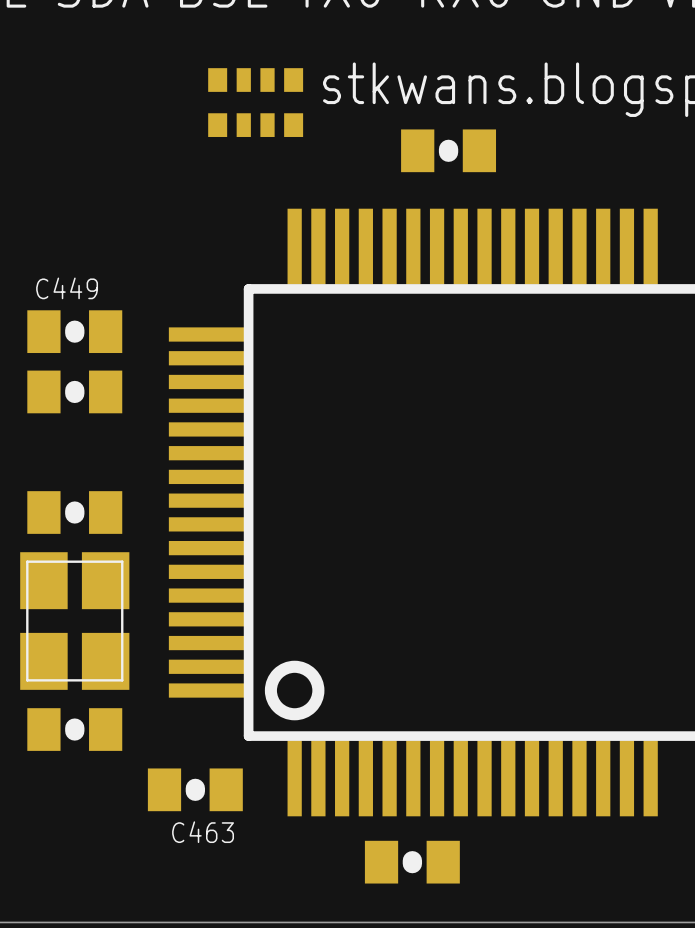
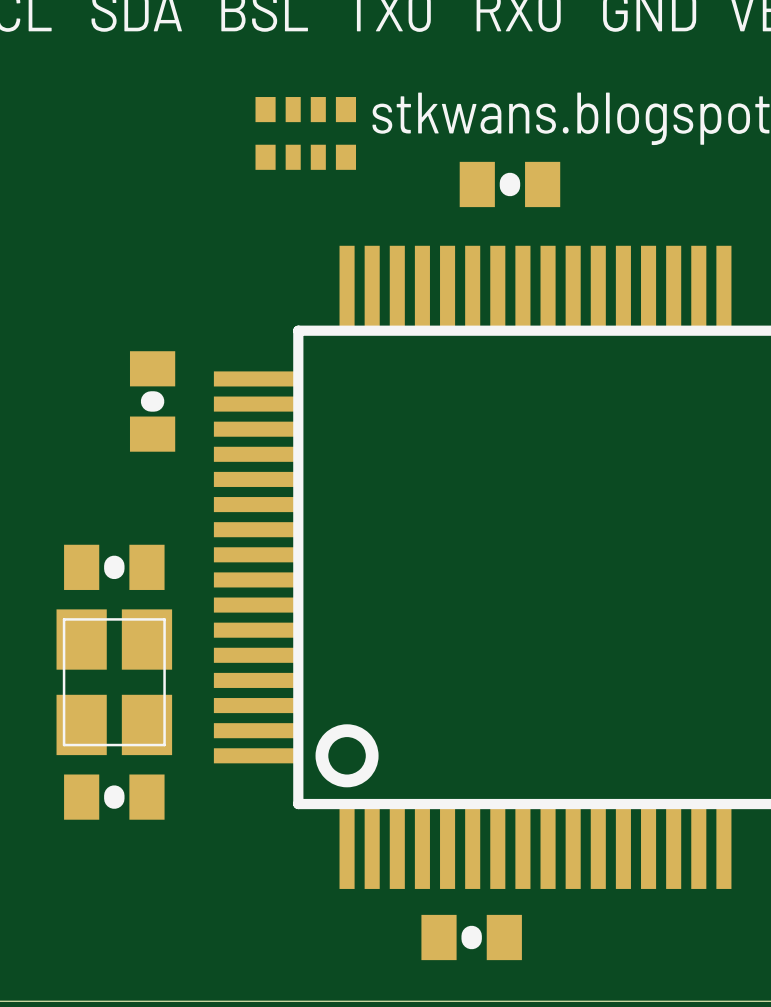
C449: (74, 331) -> none
part rotation: 0° (74, 391) -> 90° clockwise (152, 401)
C463: (195, 789) -> none

